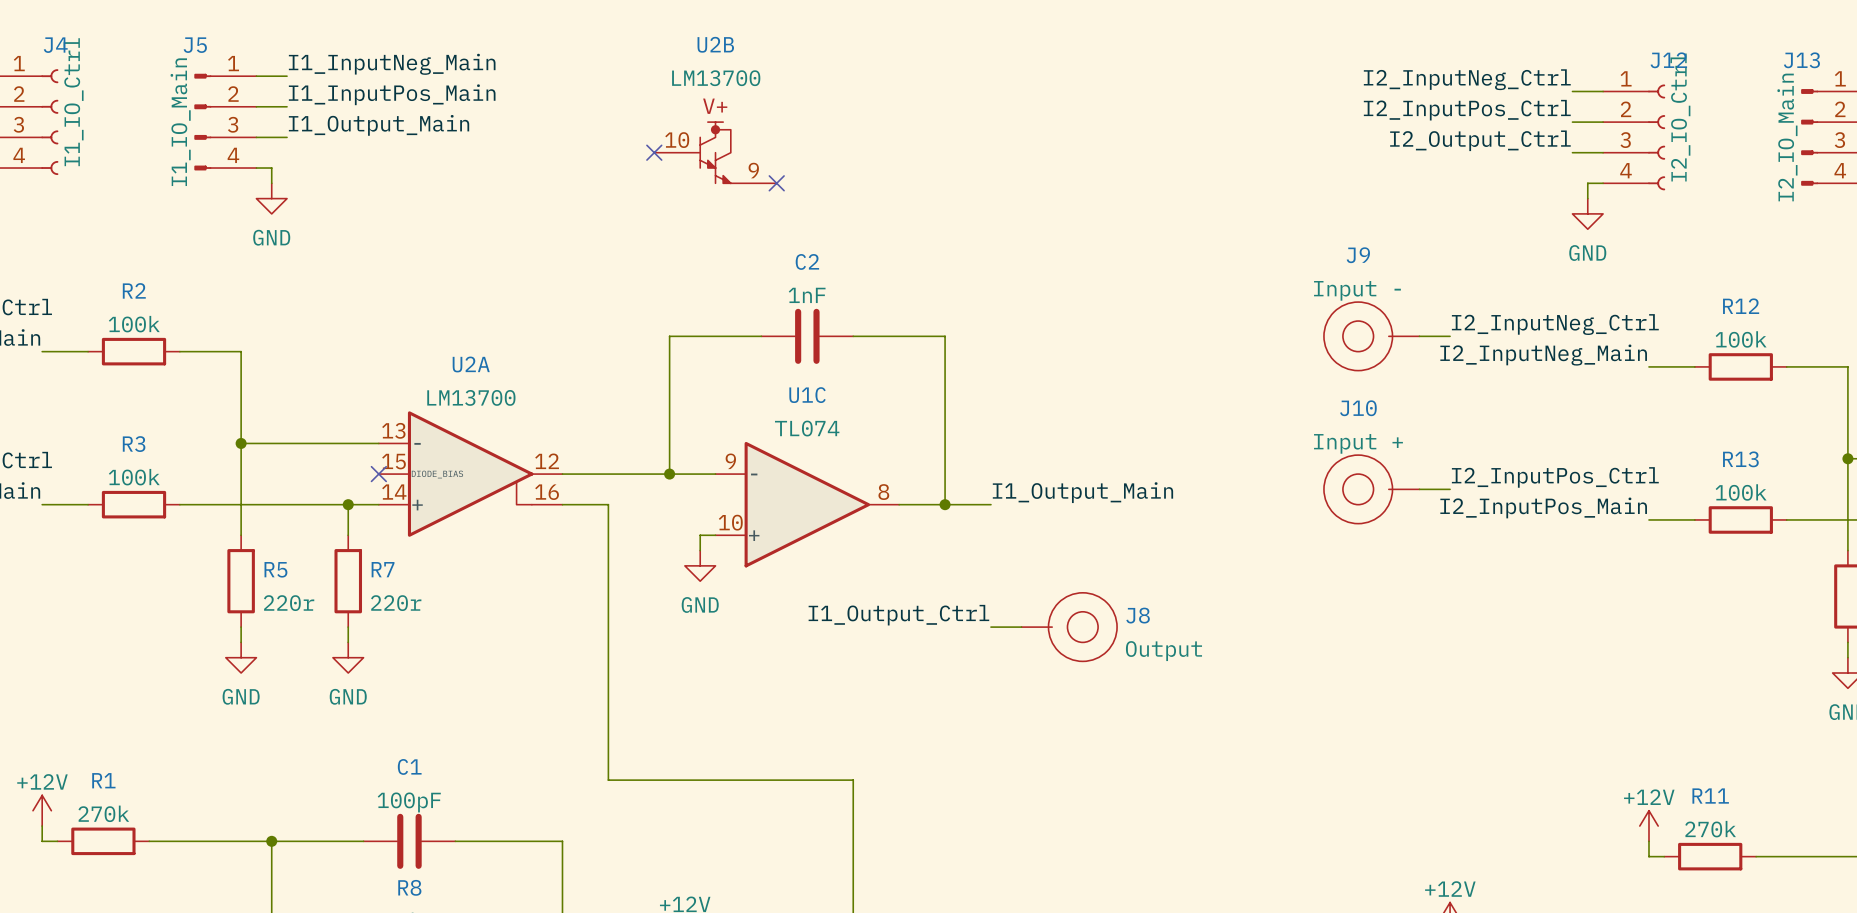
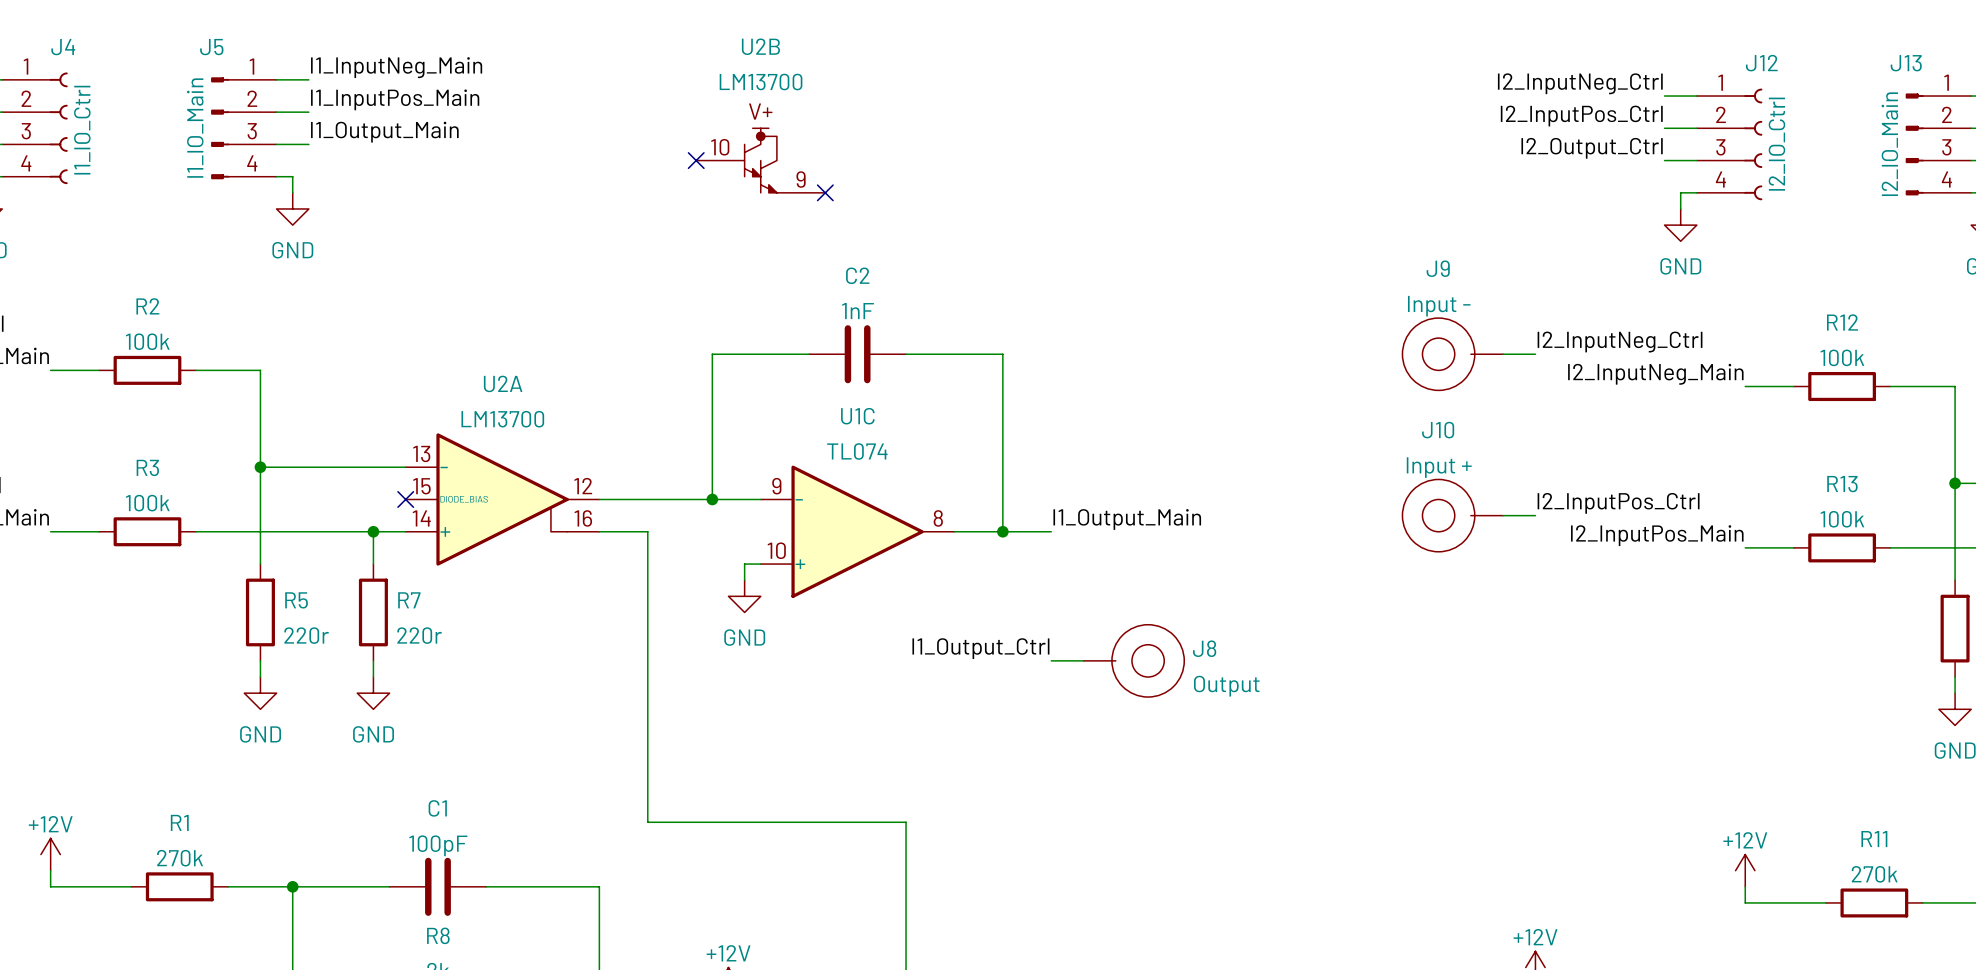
R1 position: (103, 841) -> (179, 886)
wire: (149, 841) (210, 841) -> (66, 886) (131, 886)
R11 position: (1710, 856) -> (1874, 902)
wire: (1756, 856) (1817, 856) -> (1761, 902) (1825, 902)

